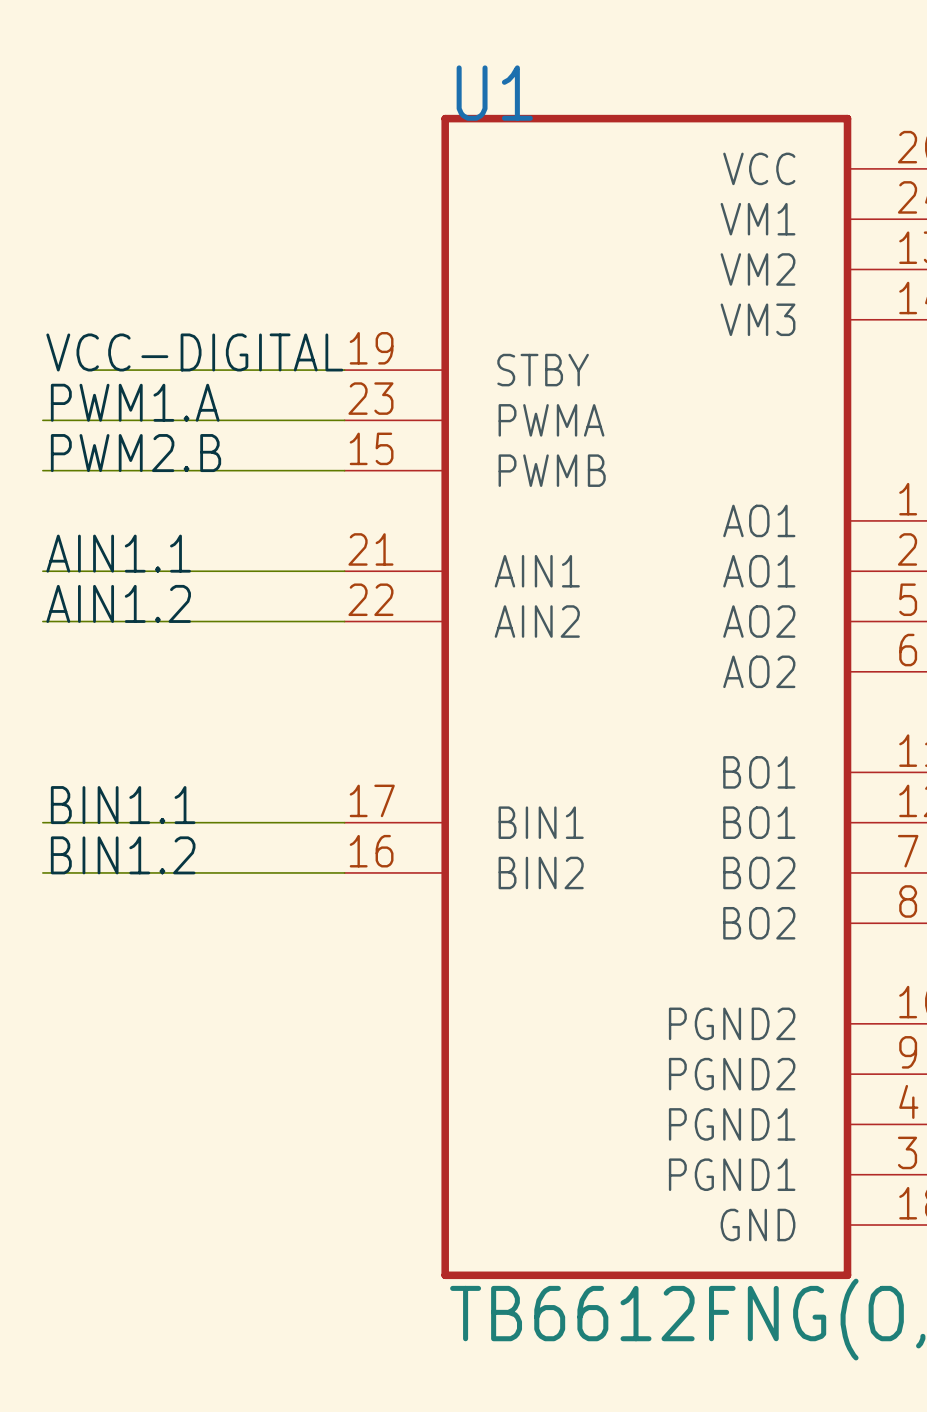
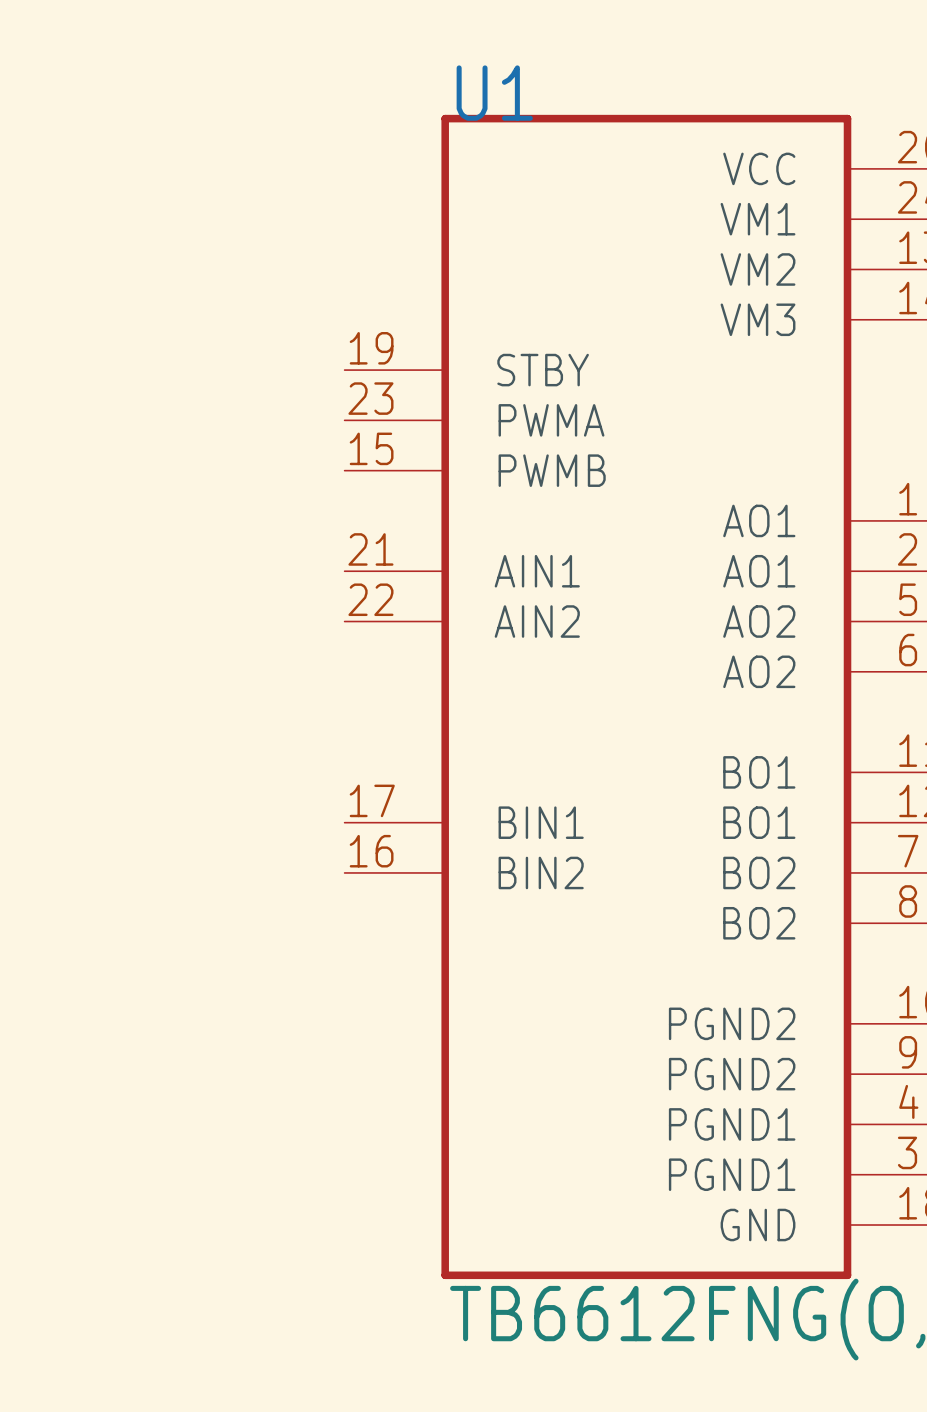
label: VCC-DIGITAL (194, 352) -> none
wire: (93, 370) (344, 370) -> none
label: PWM1.A (135, 402) -> none
wire: (42, 420) (344, 420) -> none
label: PWM2.B (136, 453) -> none
wire: (42, 470) (344, 470) -> none
label: AIN1.1 (118, 553) -> none
wire: (42, 571) (344, 571) -> none
label: AIN1.2 (118, 603) -> none
wire: (42, 621) (344, 621) -> none
label: BIN1.1 (123, 805) -> none
wire: (42, 822) (344, 822) -> none
label: BIN1.2 (123, 855) -> none
wire: (42, 872) (344, 872) -> none

